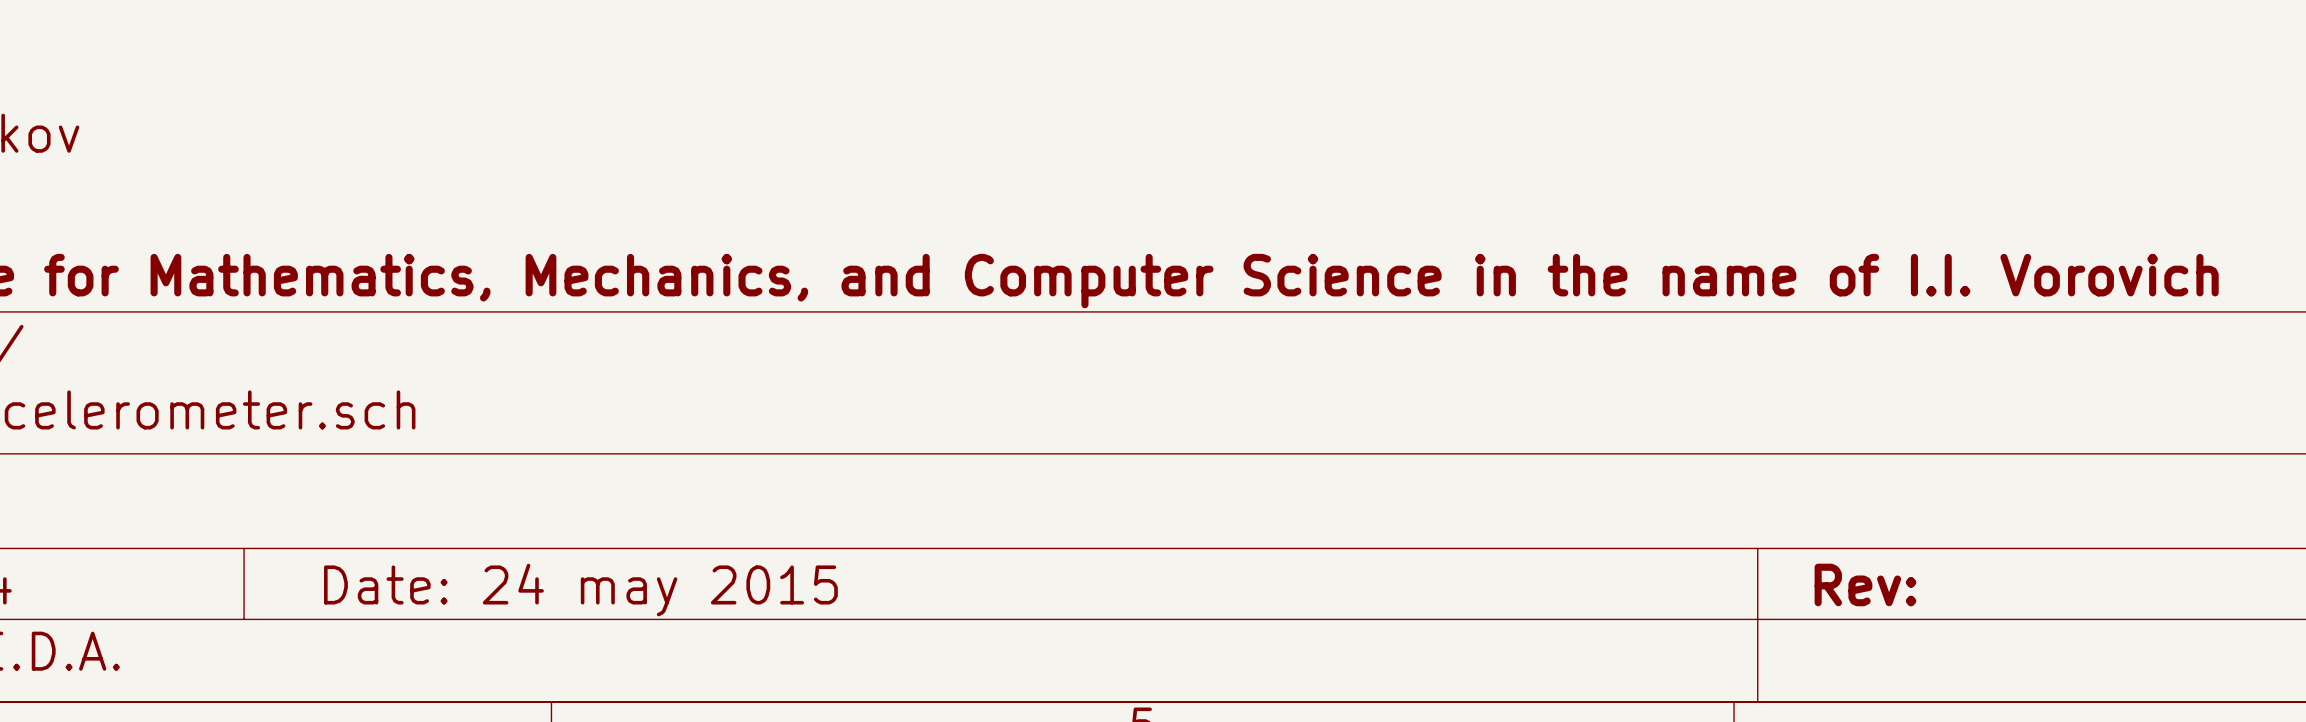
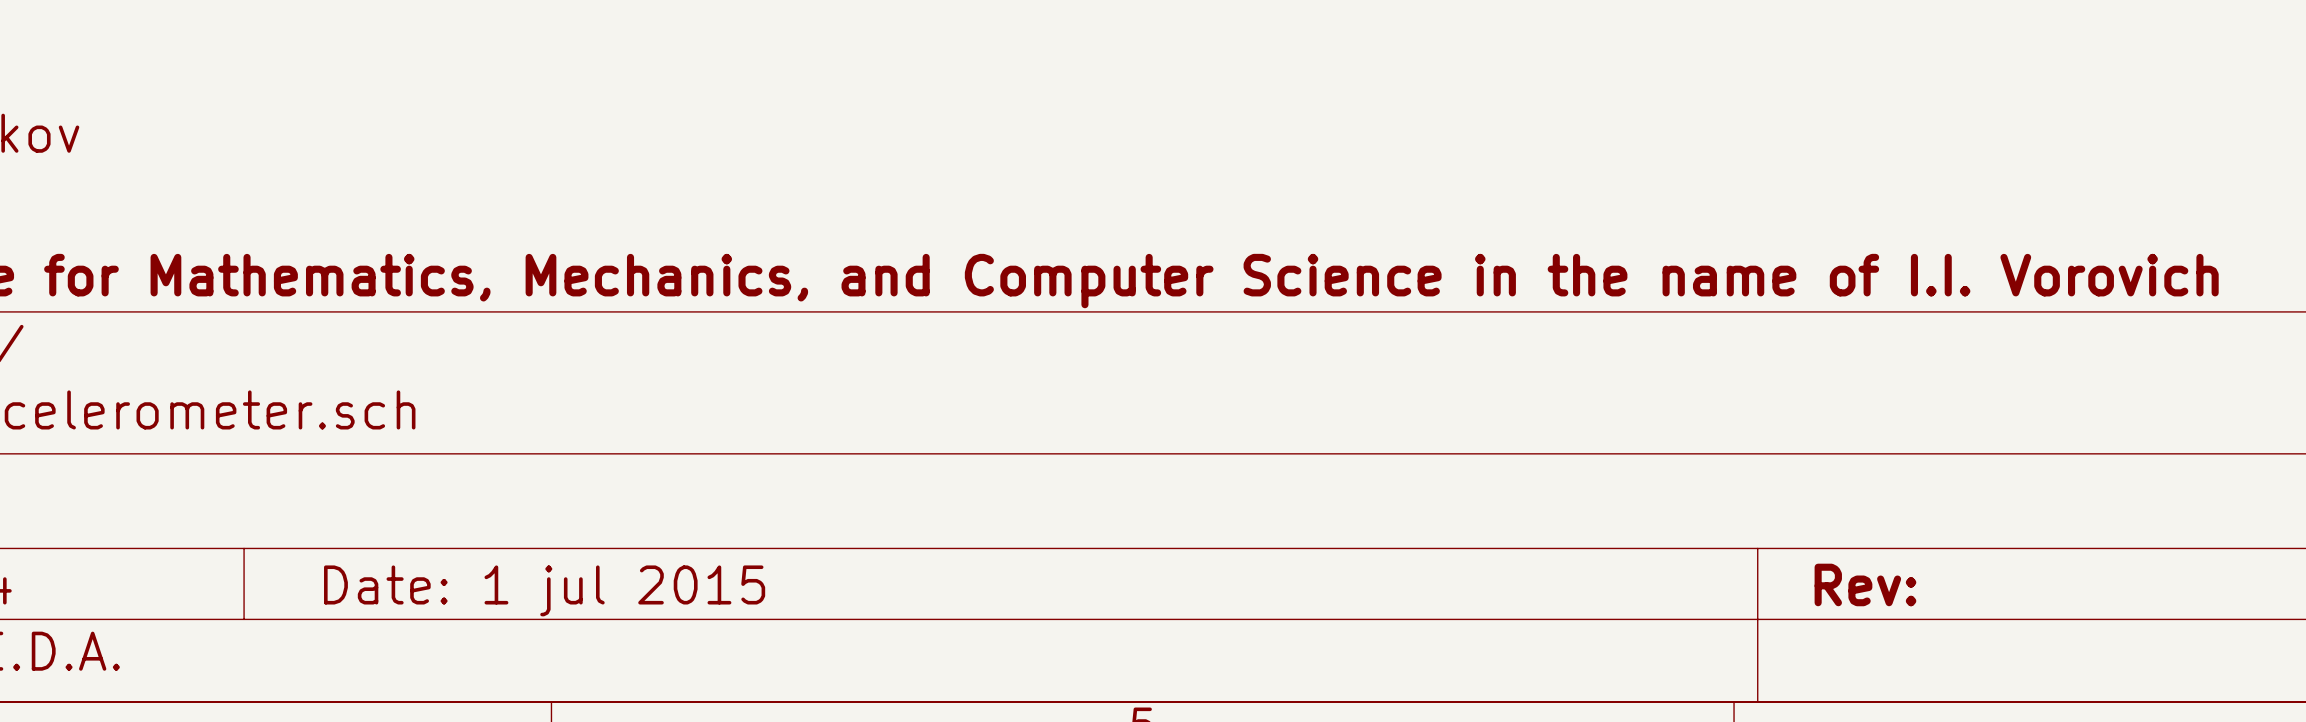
title block: Date: 24 may 2015 (580, 590) -> Date: 1 jul 2015 (544, 590)

